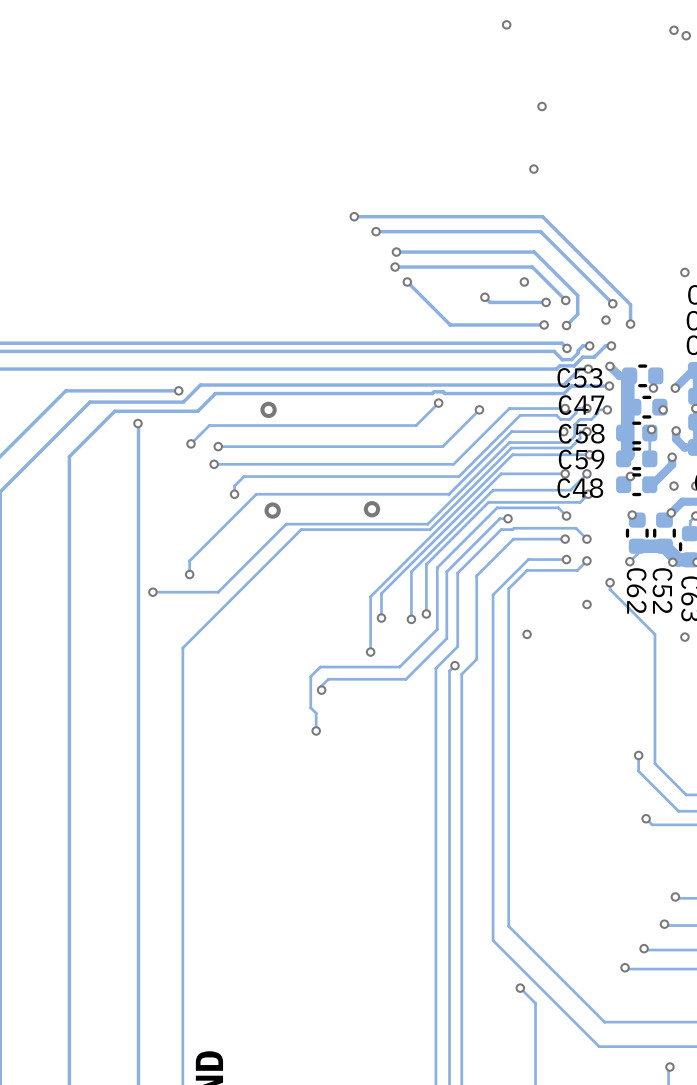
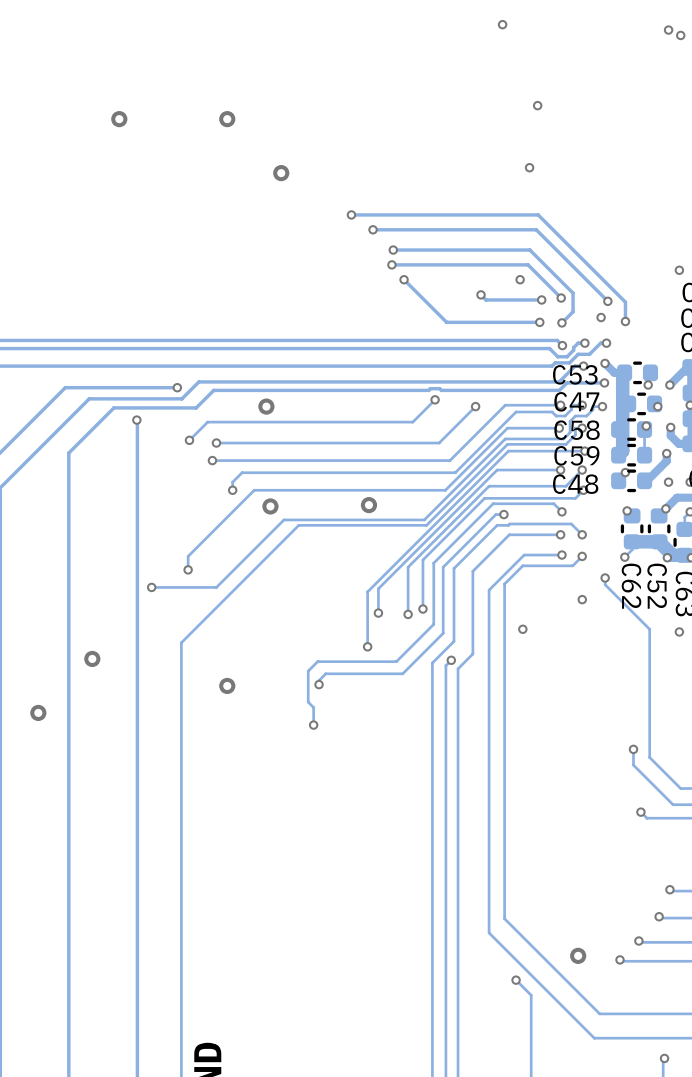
via: none -> (119, 119)
via: none -> (227, 119)
via: none -> (281, 173)
via: none -> (92, 658)
via: none -> (227, 685)
via: none -> (38, 712)
via: none -> (578, 955)

